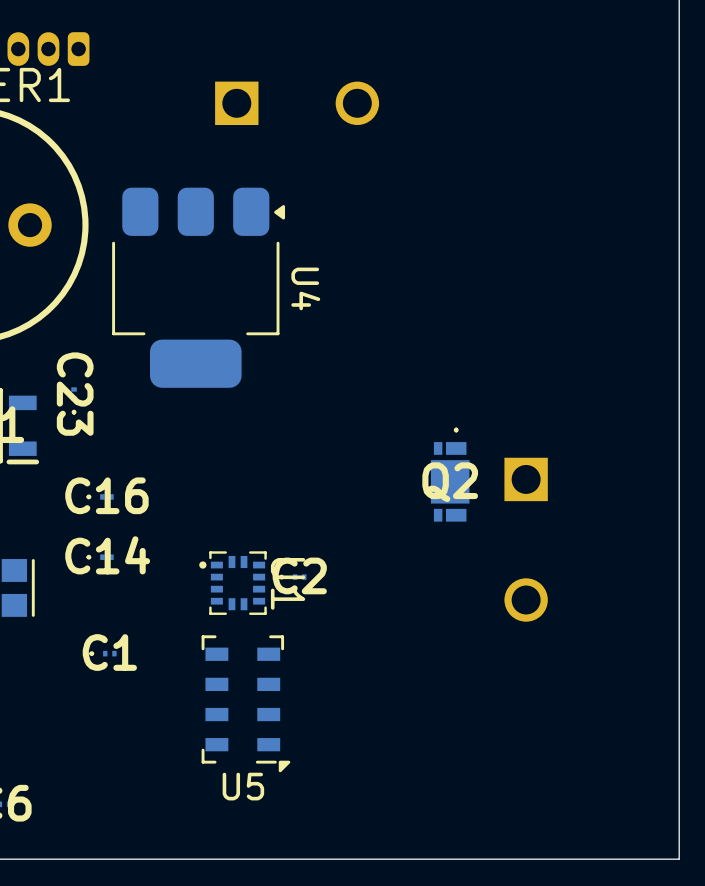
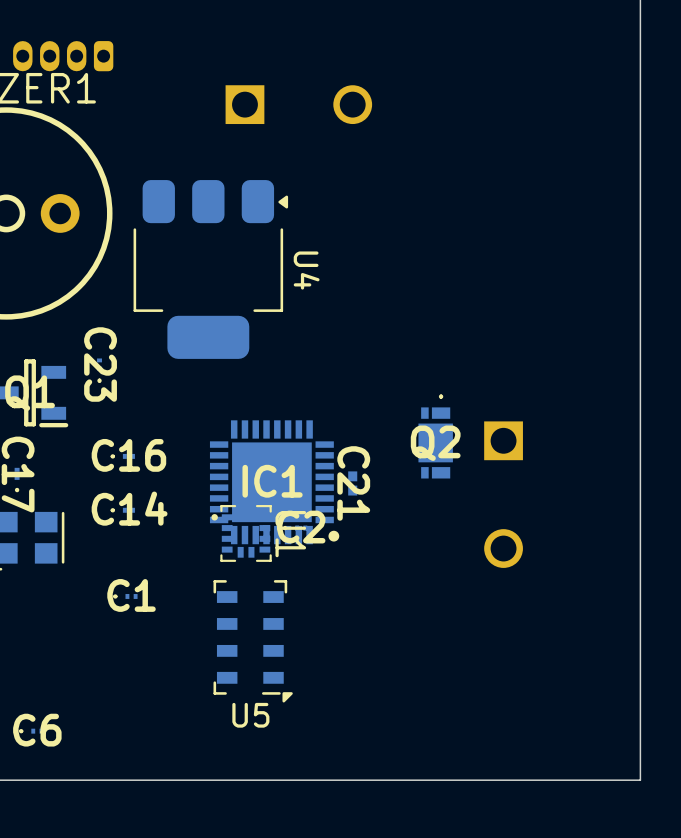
IC1: none -> (274, 482)
C21: none -> (352, 483)

